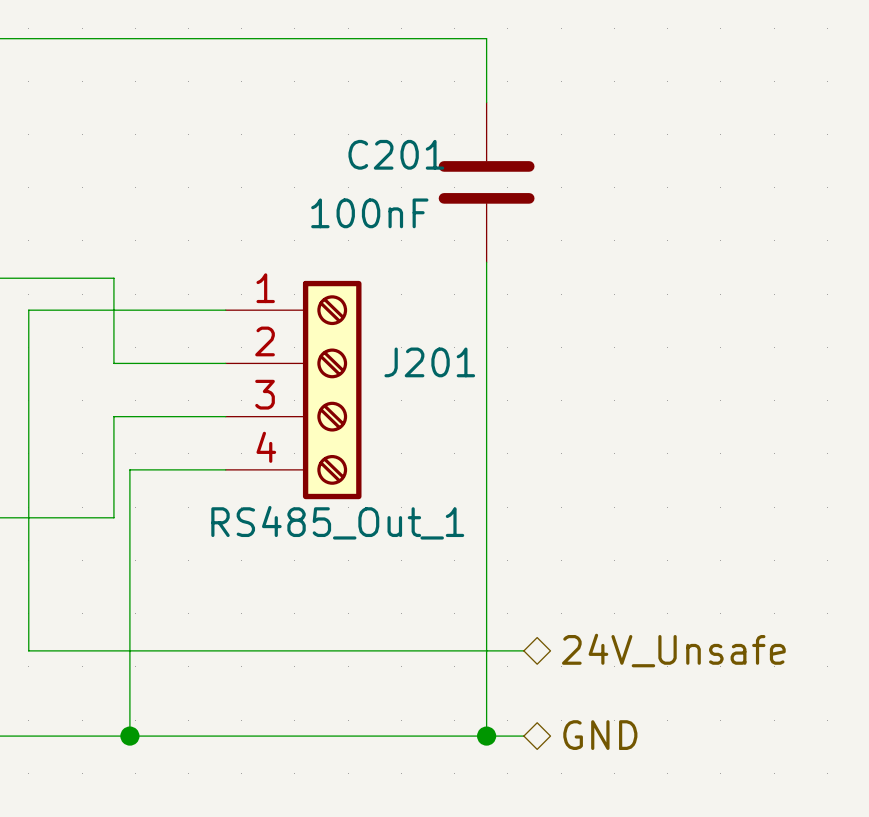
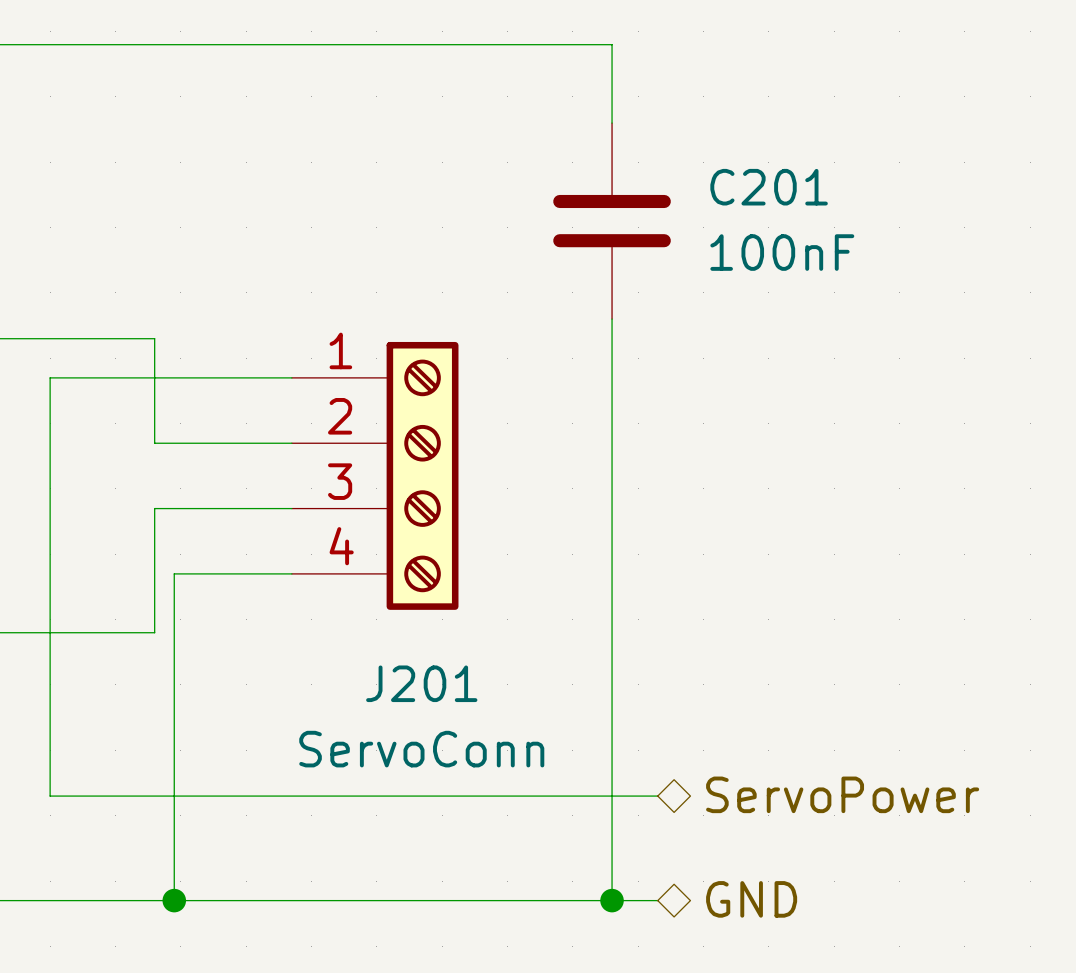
C201 name position: C201 (396, 154) -> C201 (769, 187)
C201 value position: 100nF (369, 213) -> 100nF (782, 252)
J201 name position: J201 (429, 362) -> J201 (421, 683)
J201 value: RS485_Out_1 (337, 522) -> ServoConn (421, 749)
hierarchical label: 24V_Unsafe (673, 650) -> ServoPower (842, 794)

